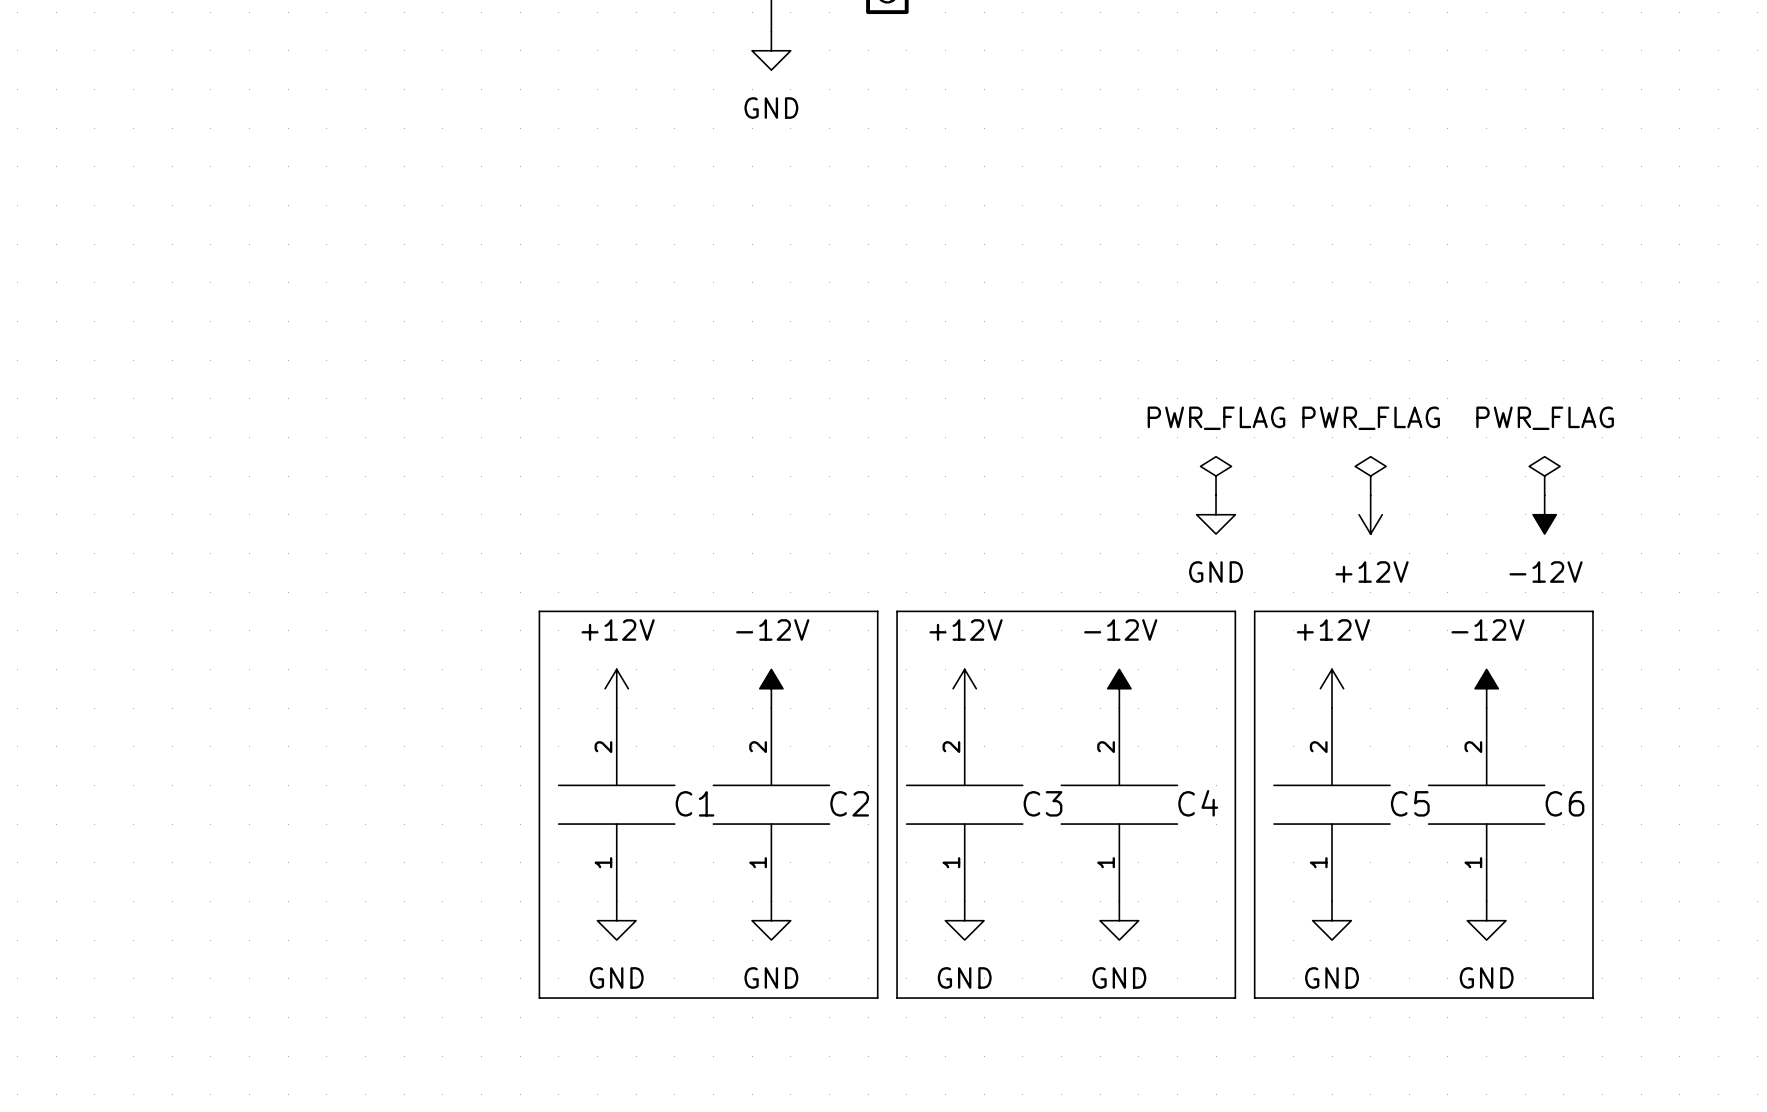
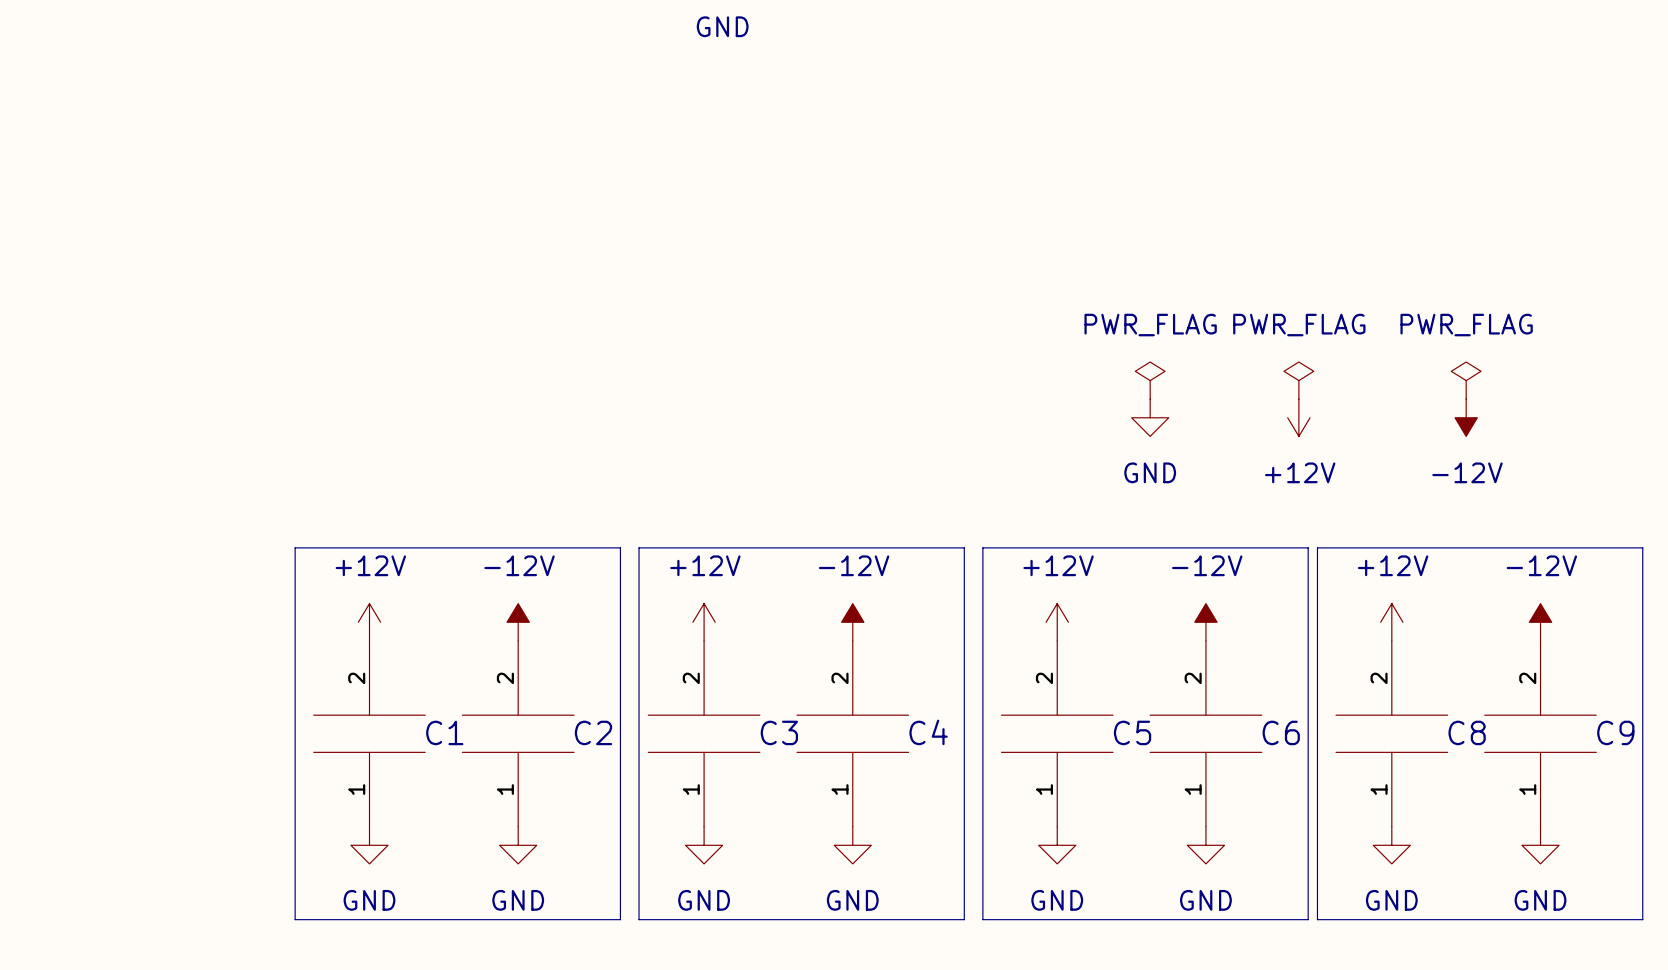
line: (539, 611) (877, 611) (877, 998) (539, 998) (539, 611) -> (295, 547) (620, 547) (620, 919) (295, 919) (295, 547)
line: (897, 611) (1235, 611) (1235, 998) (897, 998) (897, 611) -> (639, 547) (964, 547) (964, 919) (639, 919) (639, 547)
line: (1254, 611) (1592, 611) (1592, 998) (1254, 998) (1254, 611) -> (982, 547) (1308, 547) (1308, 919) (982, 919) (982, 547)
line: none -> (1317, 547) (1642, 547) (1642, 919) (1317, 919) (1317, 547)
power symbol: +12V (616, 688) -> none
power symbol: -12V (771, 688) -> none
power symbol: +12V (964, 688) -> none
power symbol: -12V (1119, 688) -> none
power symbol: +12V (1332, 688) -> none
power symbol: -12V (1486, 688) -> none
power symbol: none -> +12V (369, 622)
power symbol: none -> -12V (518, 622)
power symbol: none -> +12V (704, 622)
power symbol: none -> -12V (852, 622)
power symbol: none -> +12V (1057, 622)
power symbol: none -> -12V (1205, 622)
power symbol: none -> +12V (1391, 622)
power symbol: none -> -12V (1540, 622)
C1 position: (616, 804) -> (369, 733)
C2 position: (771, 804) -> (518, 733)
C3 position: (964, 804) -> (704, 733)
C4 position: (1119, 804) -> (852, 733)
C5 position: (1332, 804) -> (1057, 733)
C6 position: (1486, 804) -> (1205, 733)
C8: none -> (1391, 733)
C9: none -> (1540, 733)
power symbol position: GND (616, 920) -> GND (518, 845)
power symbol position: GND (771, 920) -> GND (704, 845)
power symbol position: GND (964, 920) -> GND (852, 845)
power symbol position: GND (1119, 920) -> GND (1057, 845)
power symbol position: GND (1332, 920) -> GND (1205, 845)
power symbol position: GND (1486, 920) -> GND (1391, 845)
power symbol: none -> GND (369, 845)
power symbol: none -> GND (1540, 845)

